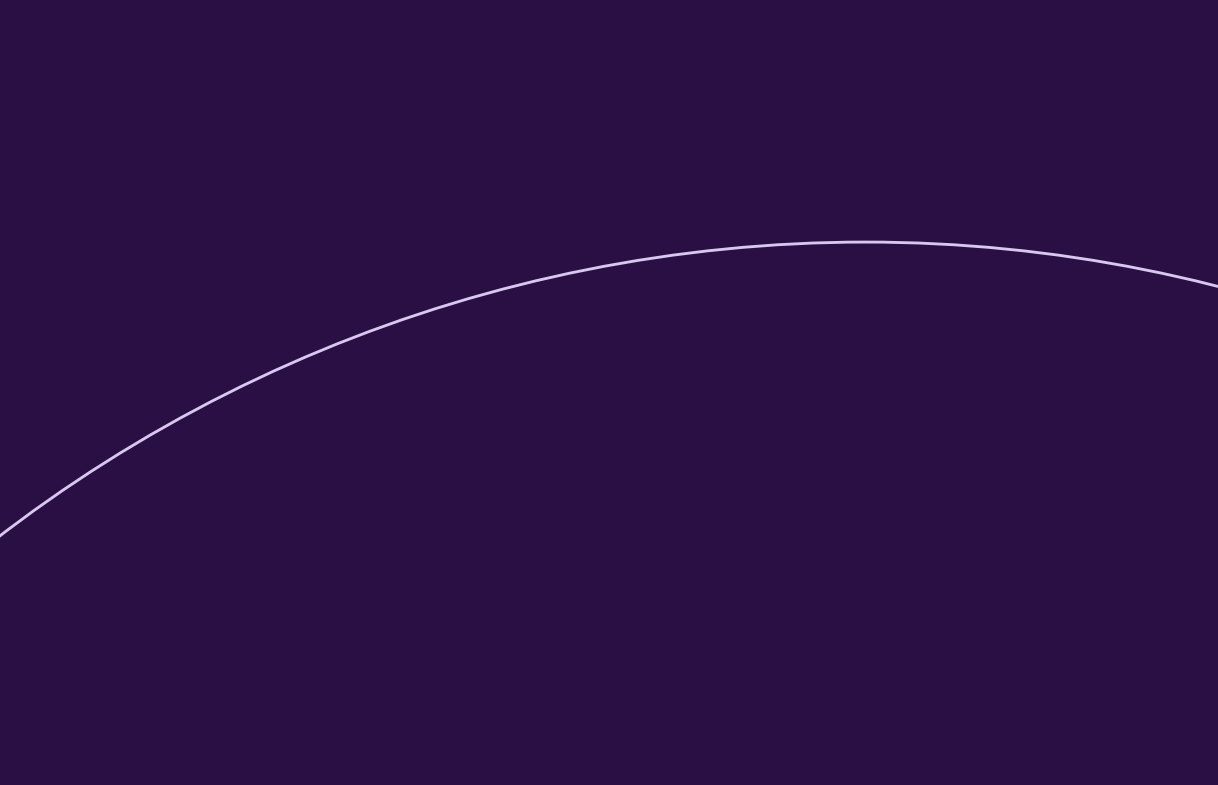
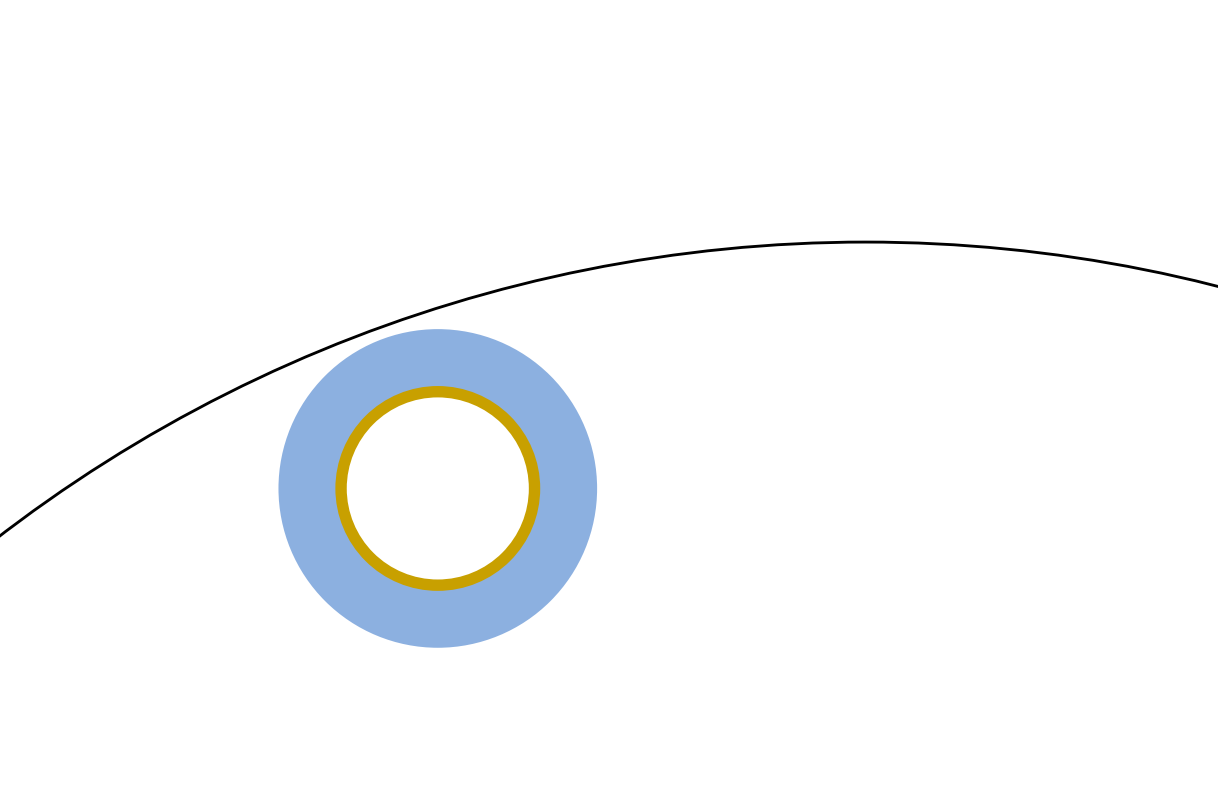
part: none -> (437, 488)

